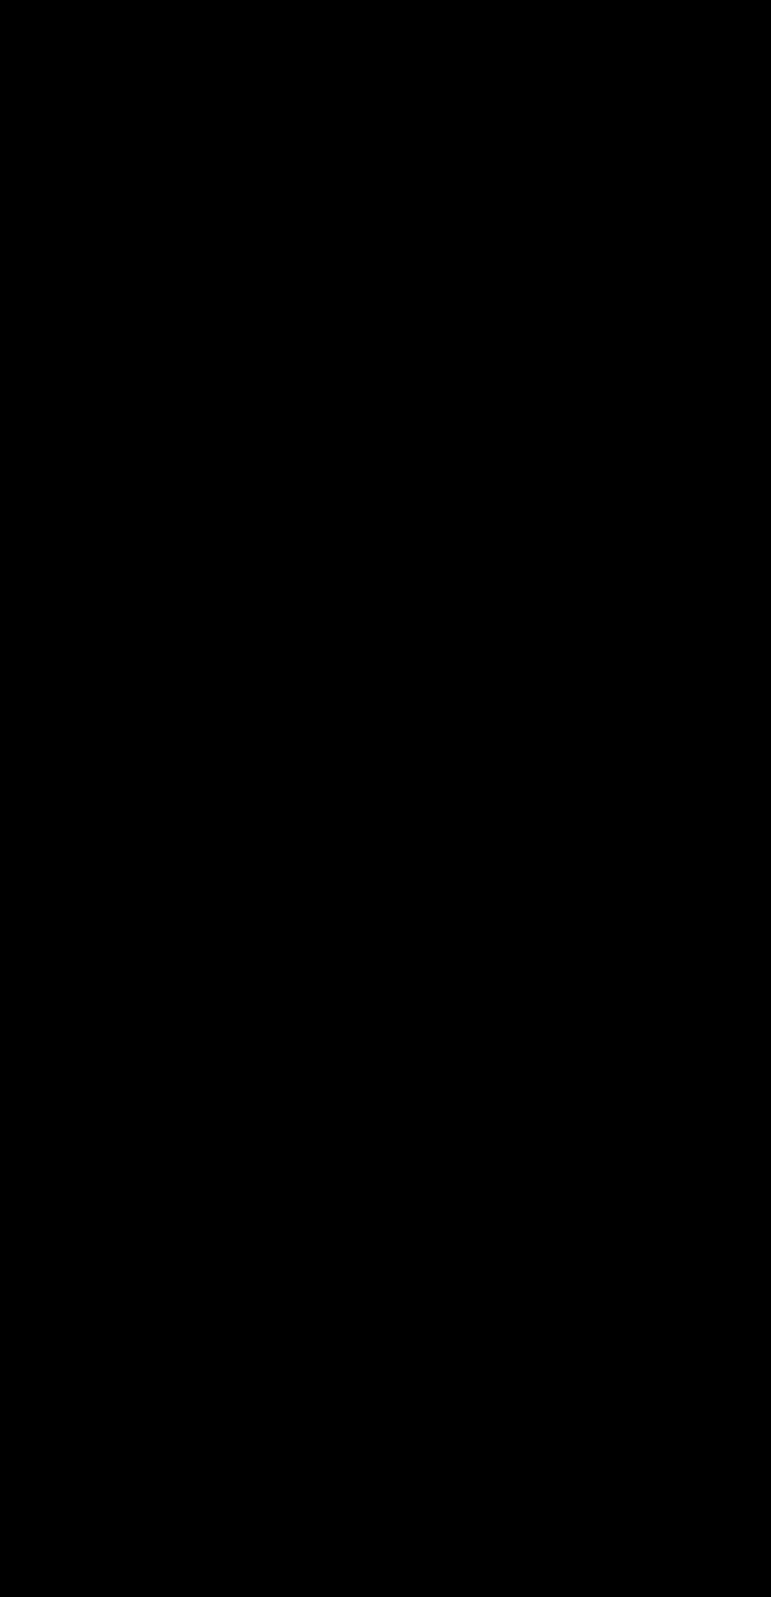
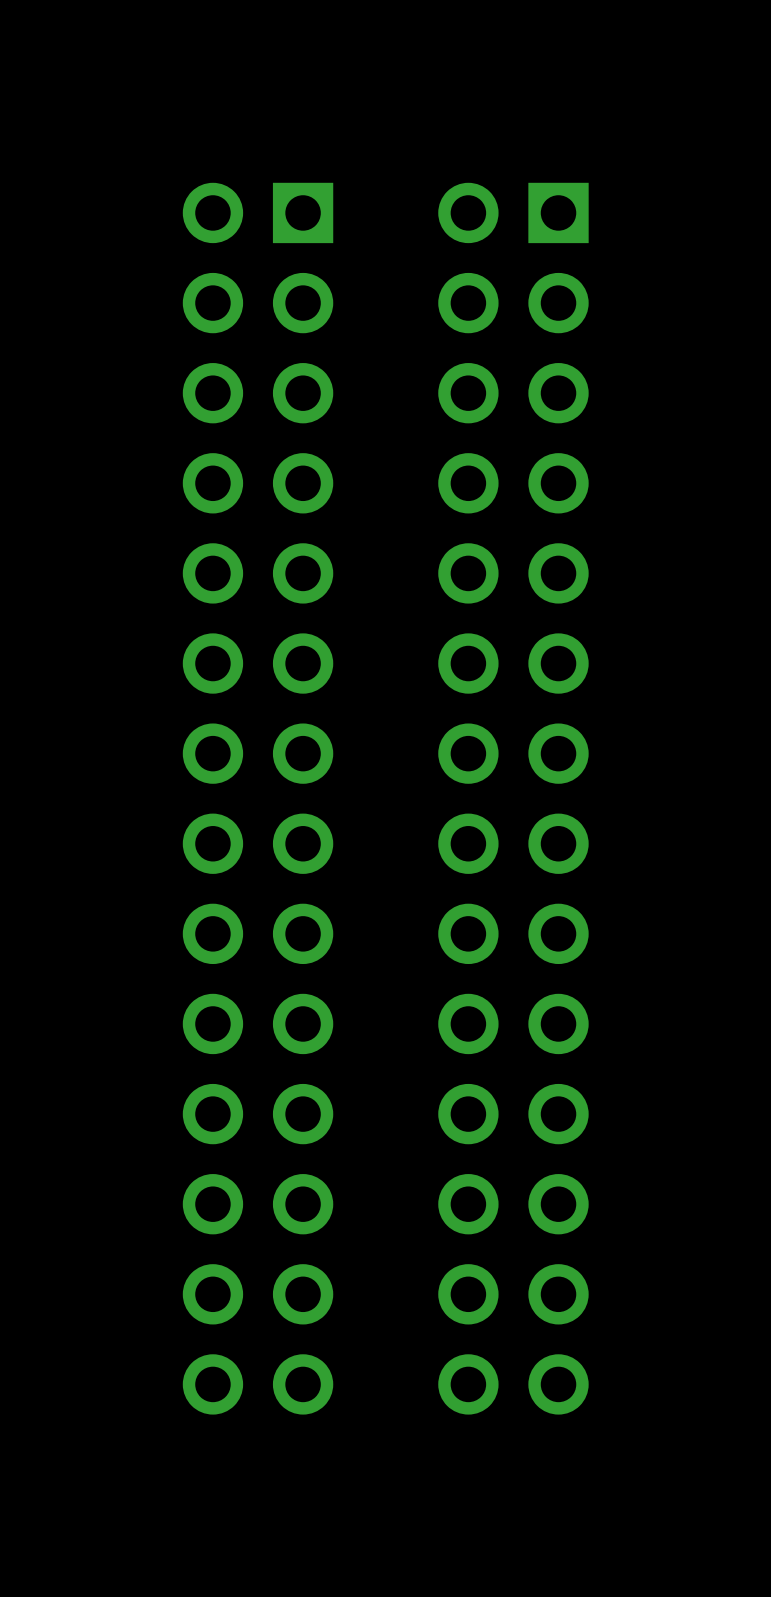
part: none -> (258, 798)
part: none -> (513, 798)

